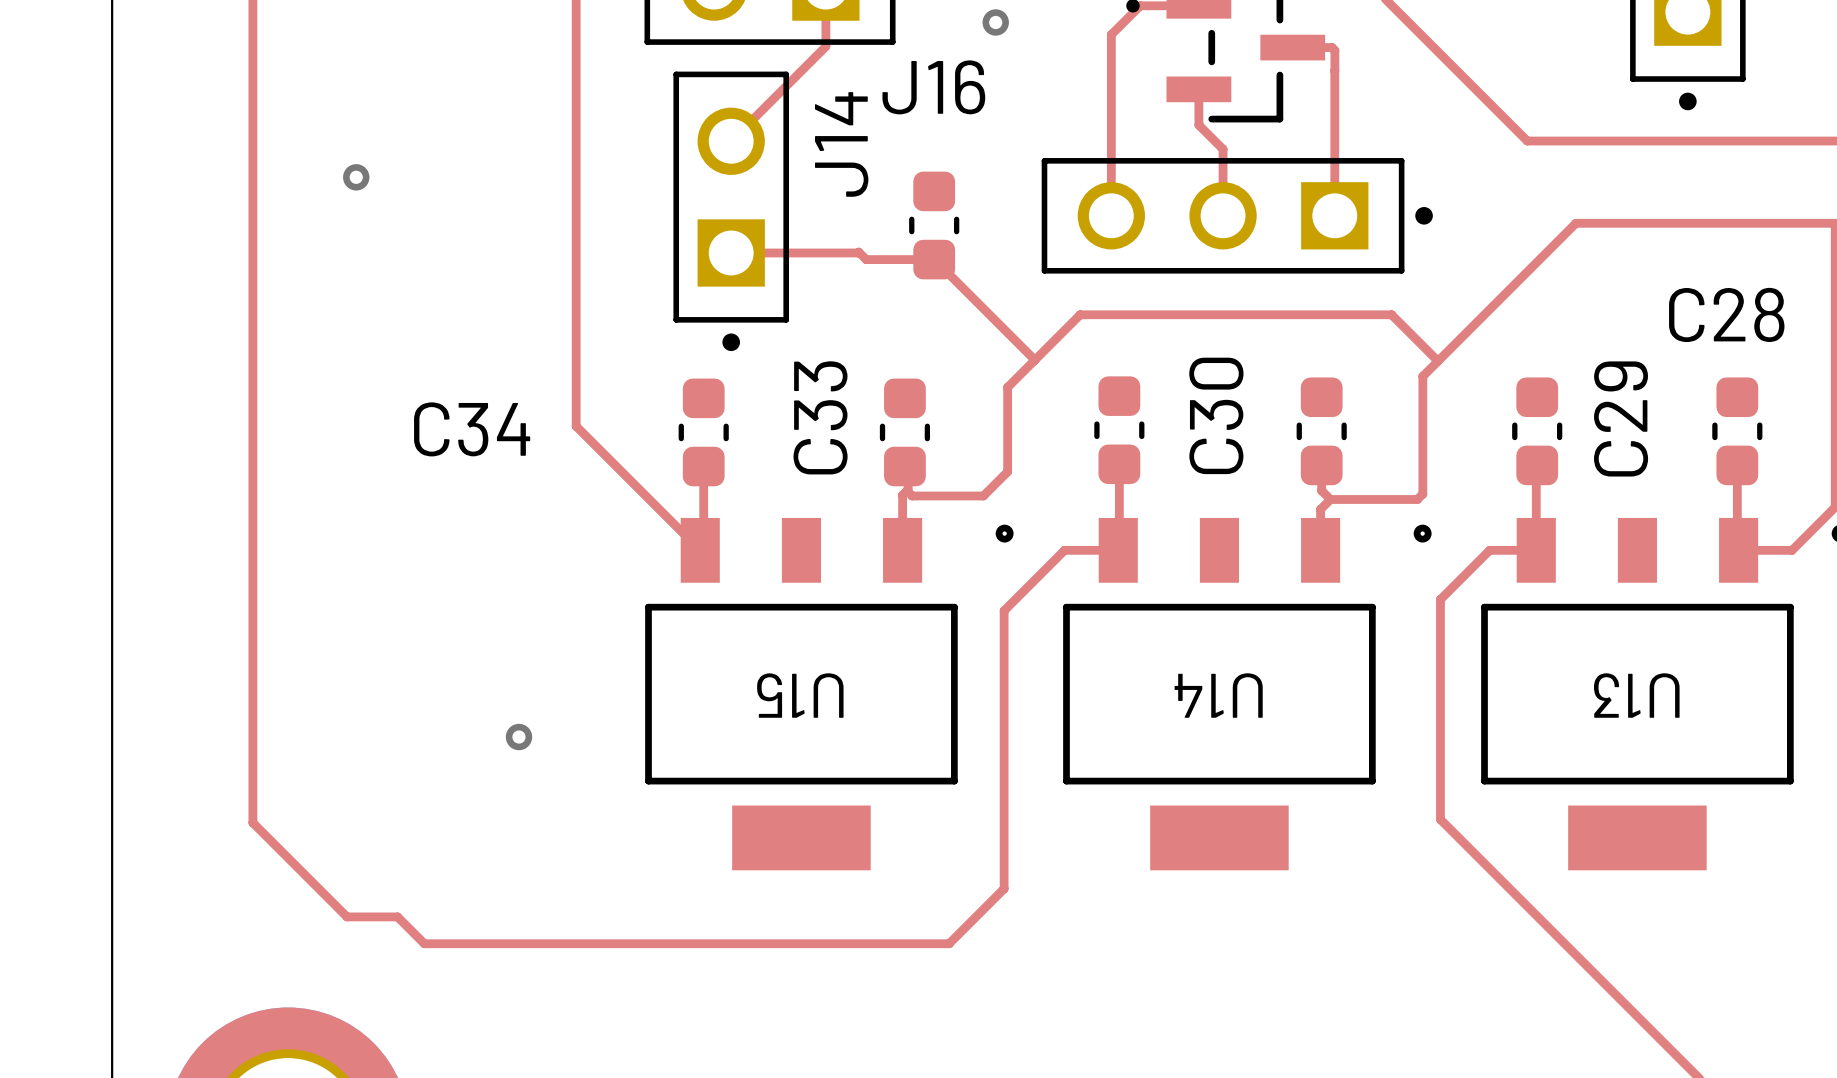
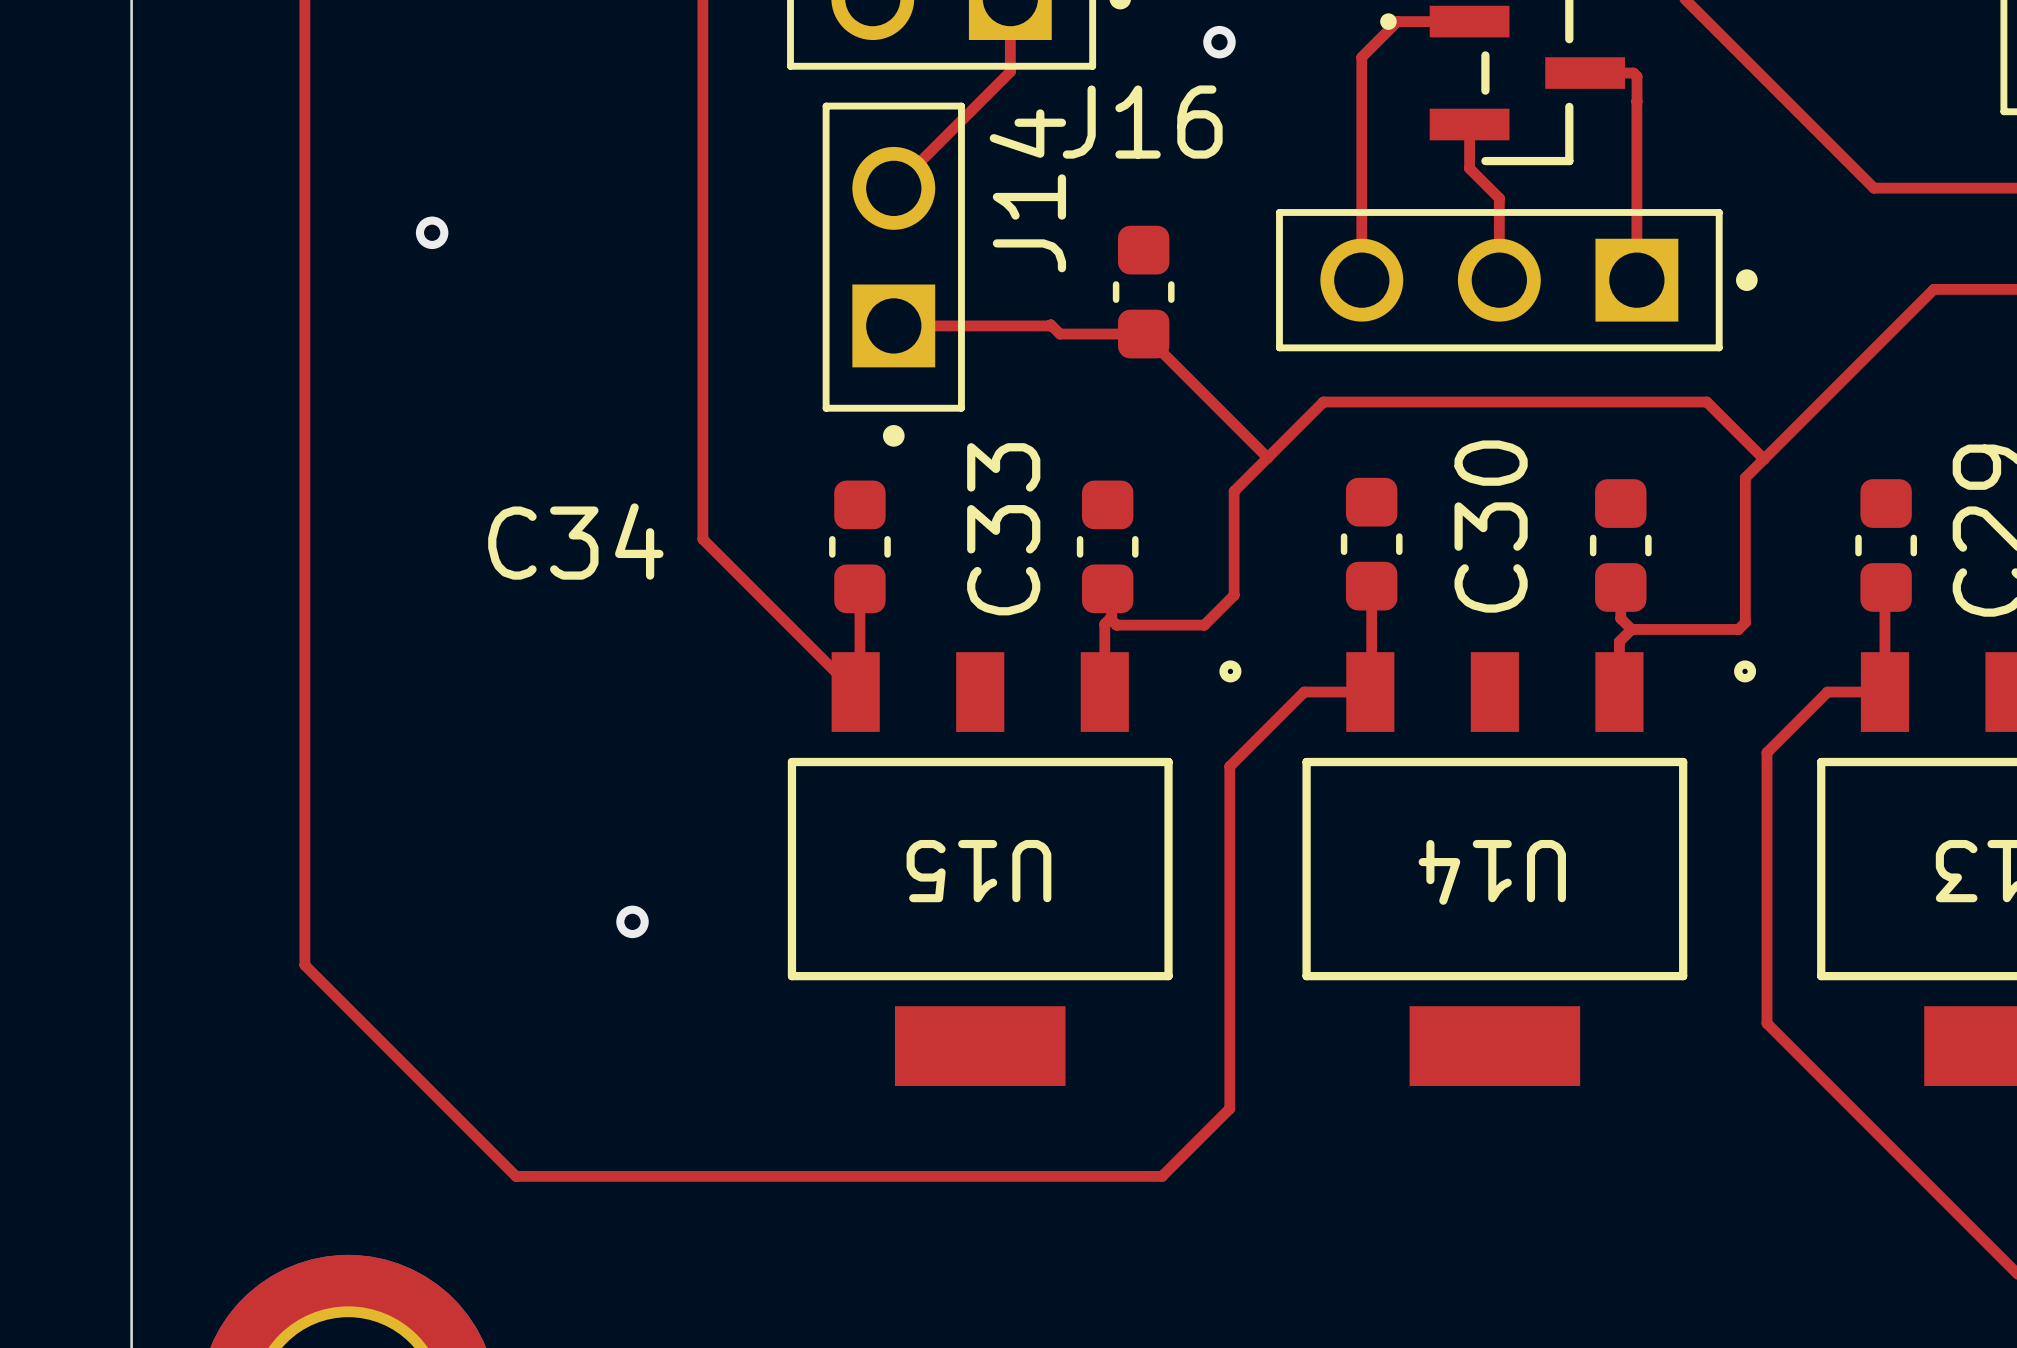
top track: (252, 772) (252, 822) (347, 916) (397, 916) -> (304, 965) (483, 1143)

